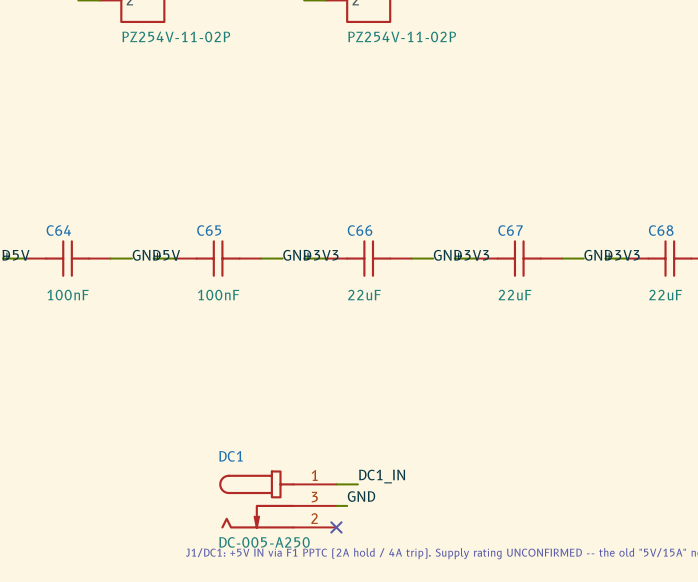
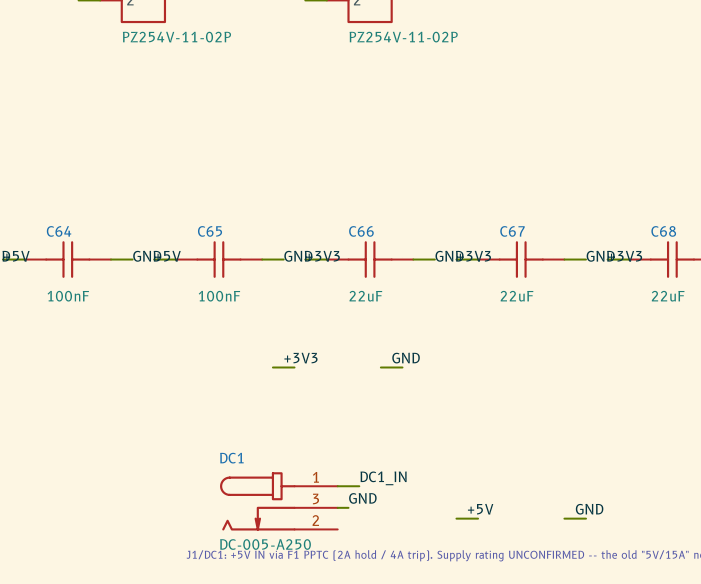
label: none -> +3V3 (300, 358)
label: none -> GND (406, 358)
wire: none -> (272, 367) (294, 367)
wire: none -> (380, 367) (402, 367)
label: none -> +5V (480, 509)
label: none -> GND (589, 509)
wire: none -> (456, 518) (478, 518)
wire: none -> (564, 518) (586, 518)
no-connect mark: (336, 527) -> none

